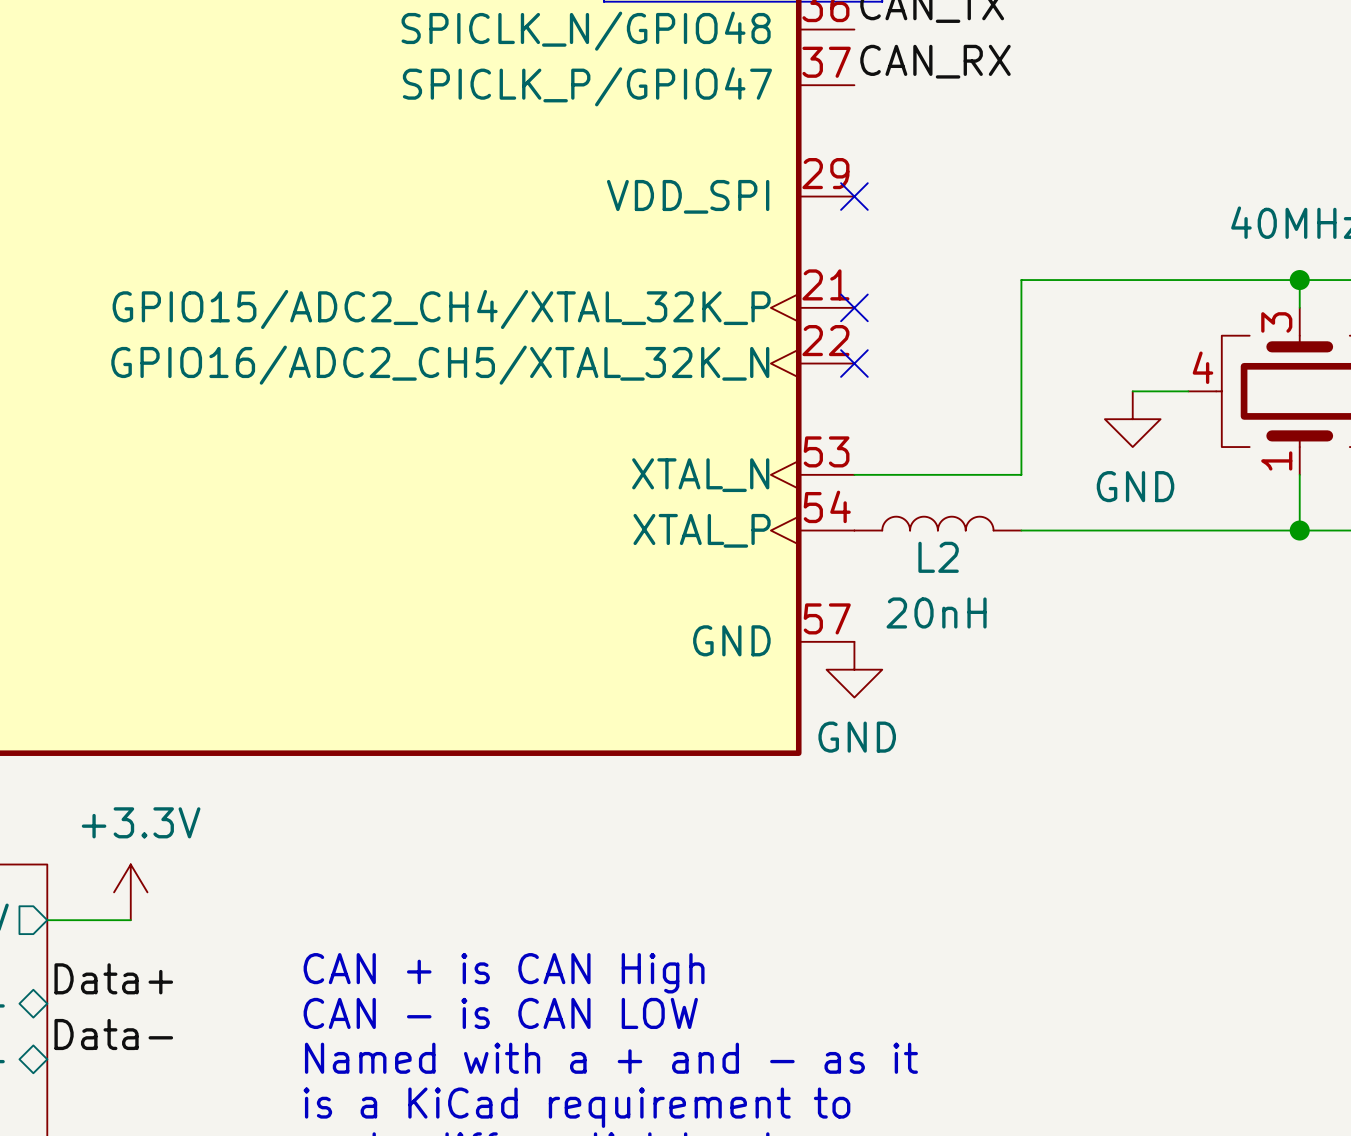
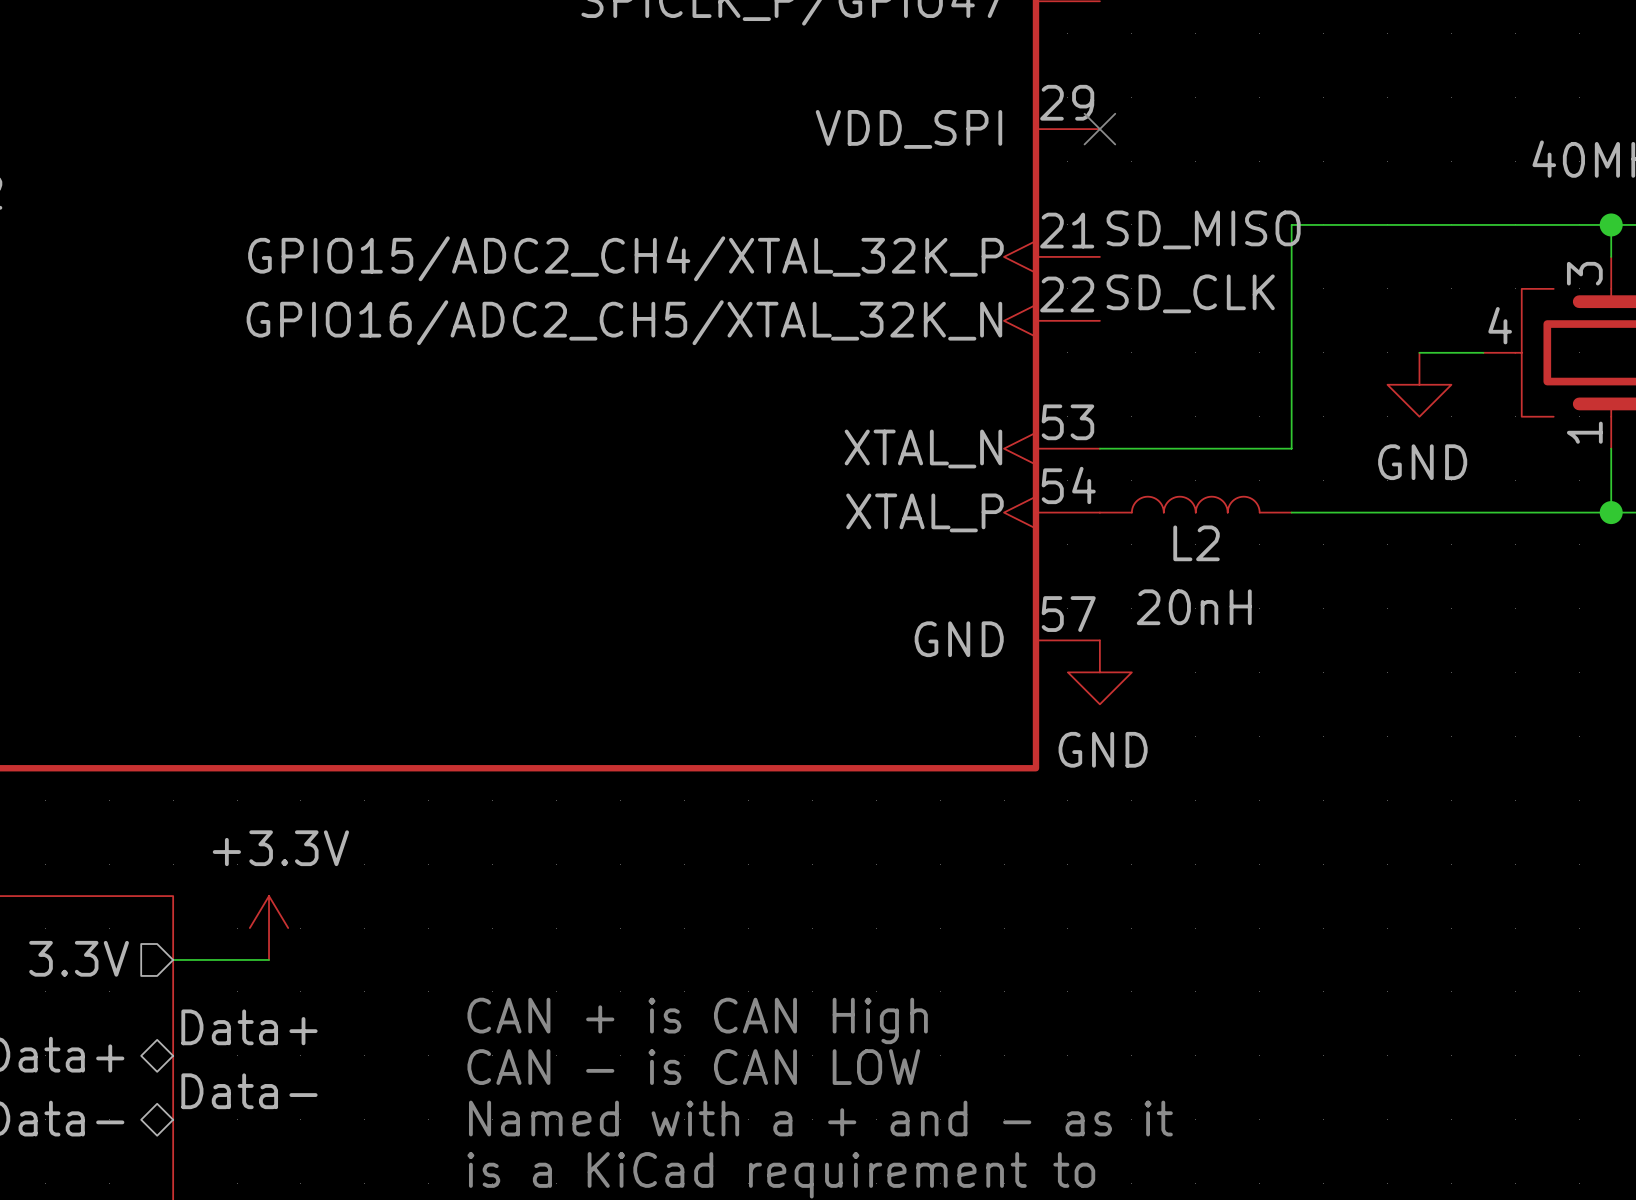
label: none -> SD_MISO (1203, 229)
no-connect mark: (854, 307) -> none
label: none -> SD_CLK (1190, 293)
no-connect mark: (854, 363) -> none

